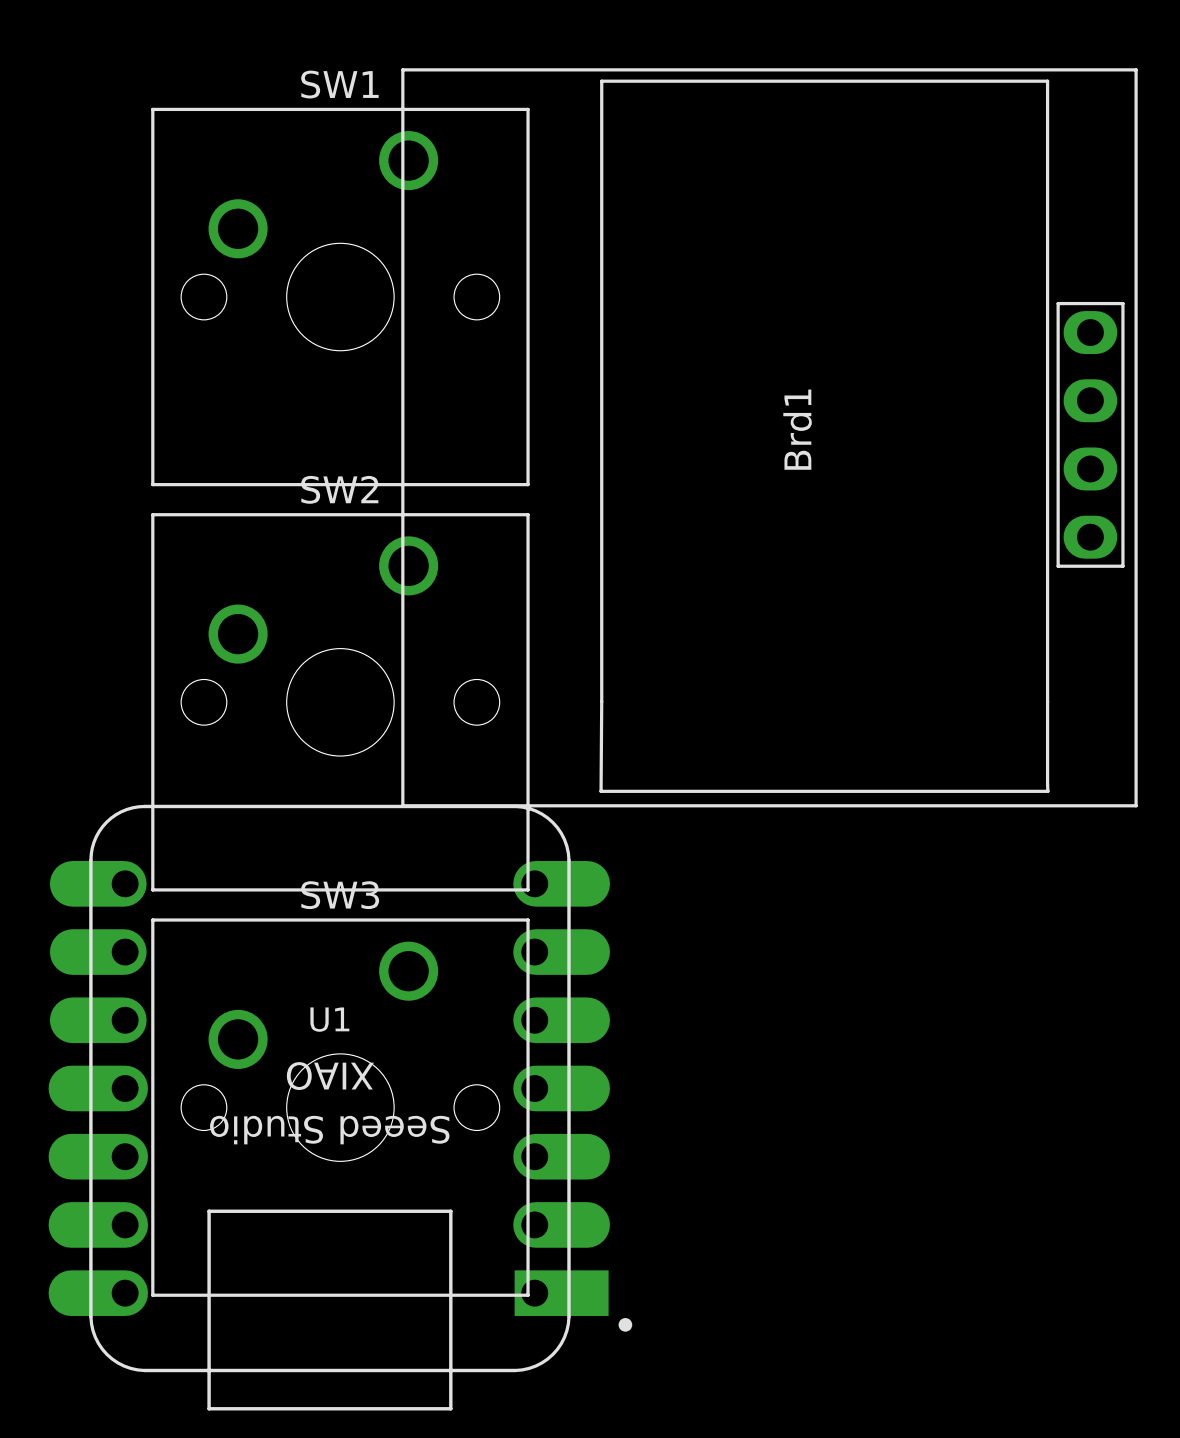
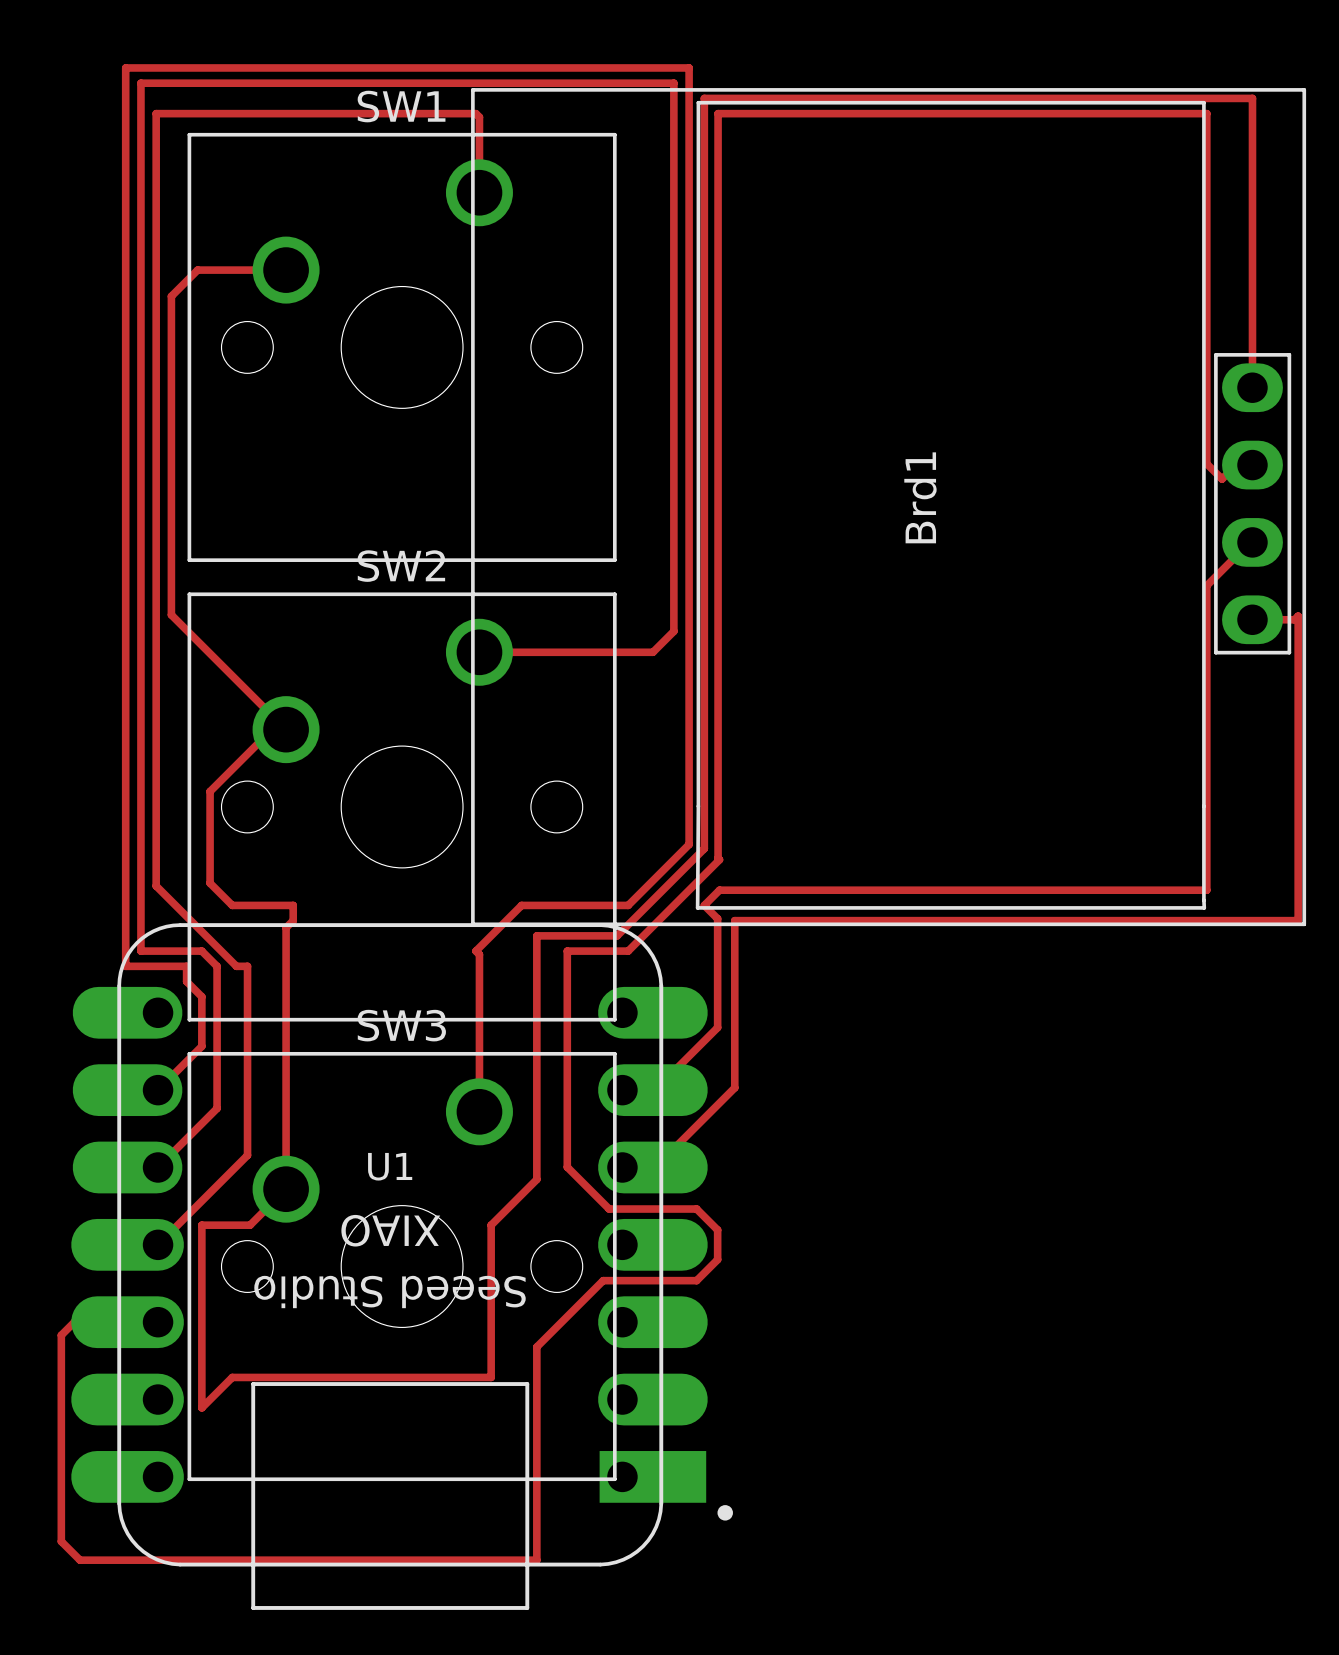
track: none -> (479, 192) (479, 117) (475, 113) (156, 113) (156, 886) (236, 966) (247, 966) (247, 1155) (158, 1244)
track: none -> (286, 270) (197, 270) (171, 296) (171, 614) (286, 729) (271, 729) (210, 791) (210, 883) (232, 905) (293, 905) (293, 920) (286, 927) (286, 1189) (250, 1225) (201, 1225) (201, 1407) (232, 1377) (491, 1377) (491, 1225) (536, 1179) (536, 935) (617, 935) (704, 848) (704, 98) (1252, 98) (1252, 387)
track: none -> (1252, 465) (1236, 465) (1222, 479) (1206, 463) (1206, 113) (718, 113) (719, 859) (628, 951) (567, 951) (567, 1167) (609, 1209) (696, 1209) (717, 1230) (717, 1259) (696, 1280) (603, 1280) (536, 1347) (536, 1560) (80, 1560) (61, 1541) (61, 1335) (74, 1322) (158, 1322)
track: none -> (1252, 542) (1250, 542) (1206, 585) (1206, 890) (719, 890) (704, 905) (717, 918) (717, 1027) (655, 1090) (622, 1090)
track: none -> (1252, 619) (1294, 619) (1298, 616) (1298, 920) (734, 920) (734, 1087) (655, 1167) (622, 1167)
track: none -> (479, 652) (652, 652) (673, 631) (673, 83) (140, 83) (140, 951) (201, 951) (217, 966) (217, 1108) (158, 1167)
track: none -> (158, 1090) (201, 1046) (201, 996) (186, 981) (186, 966) (125, 966) (125, 67) (689, 67) (689, 844) (628, 905) (521, 905) (475, 951) (479, 954) (479, 1111)

